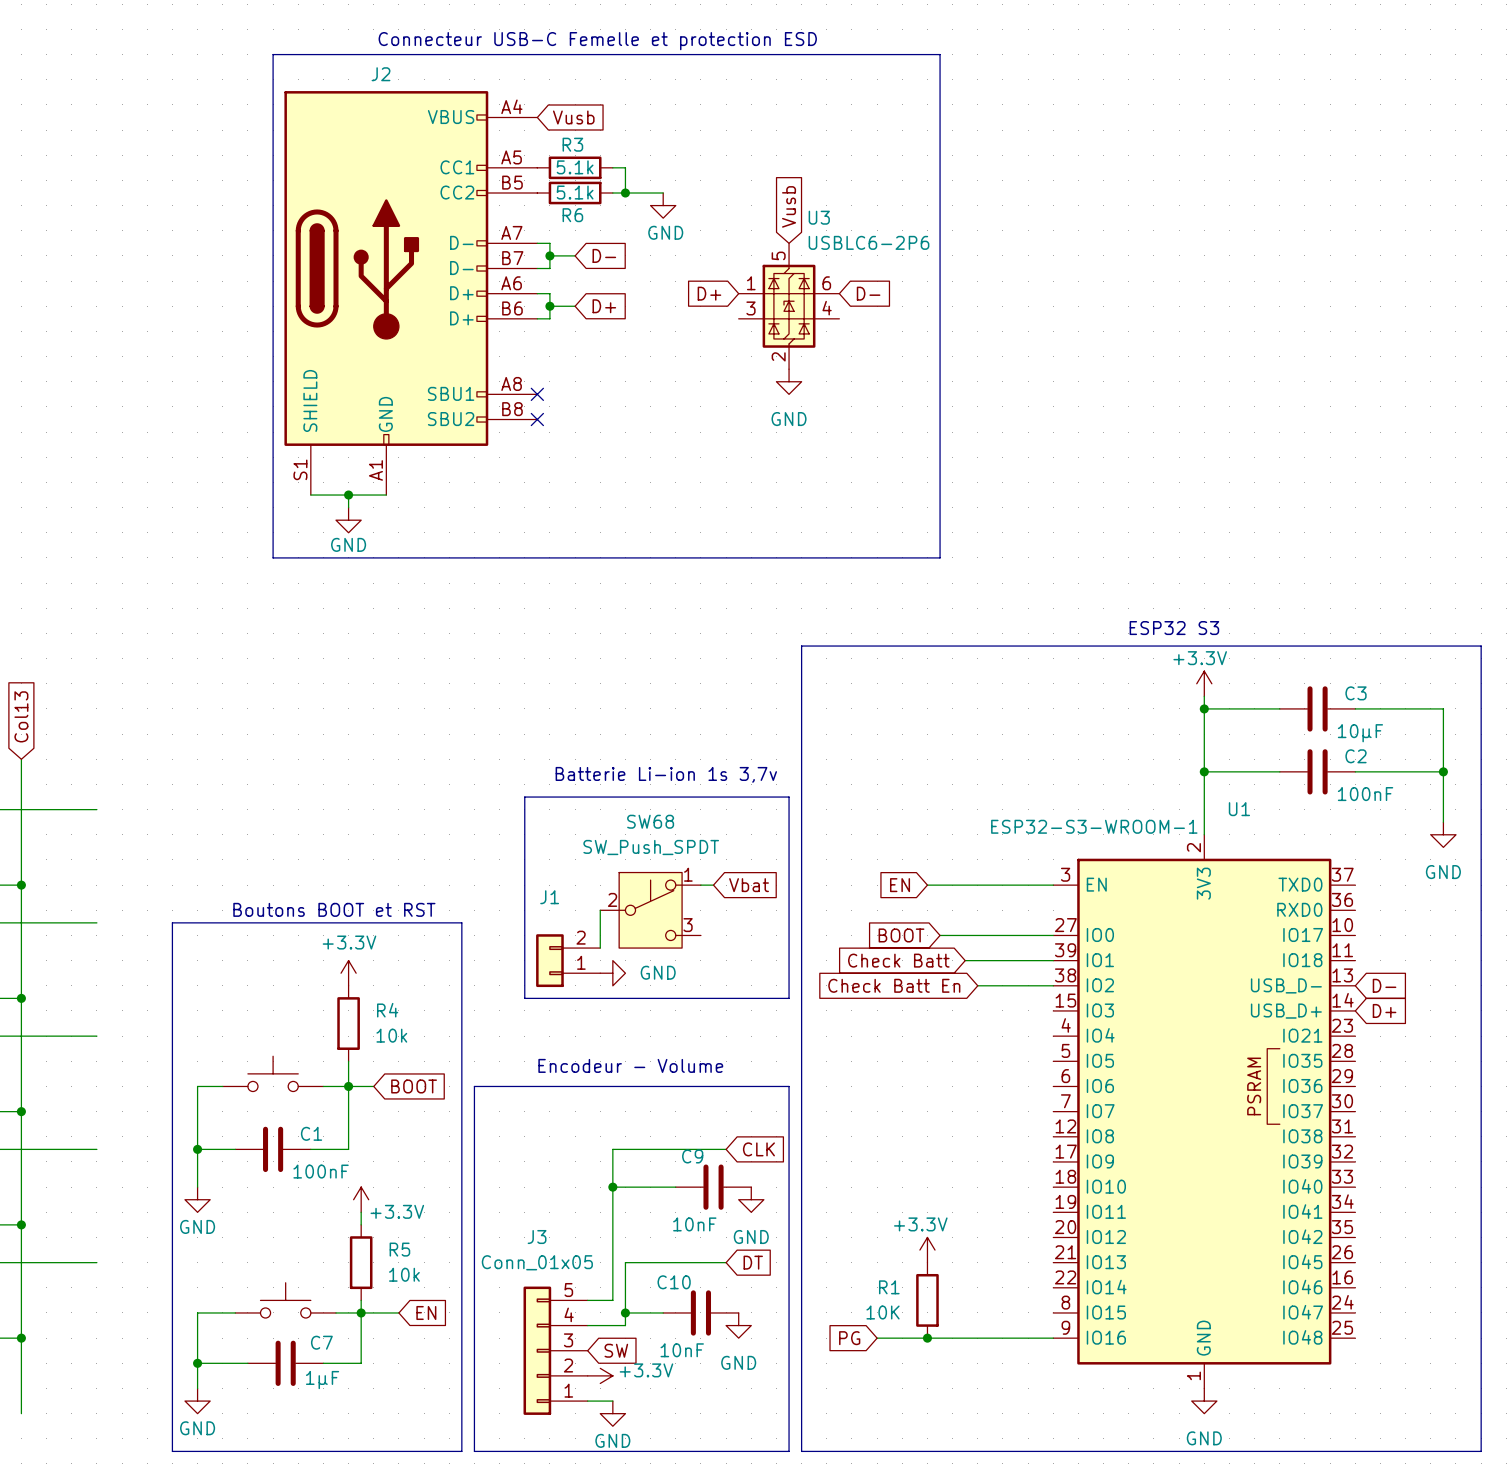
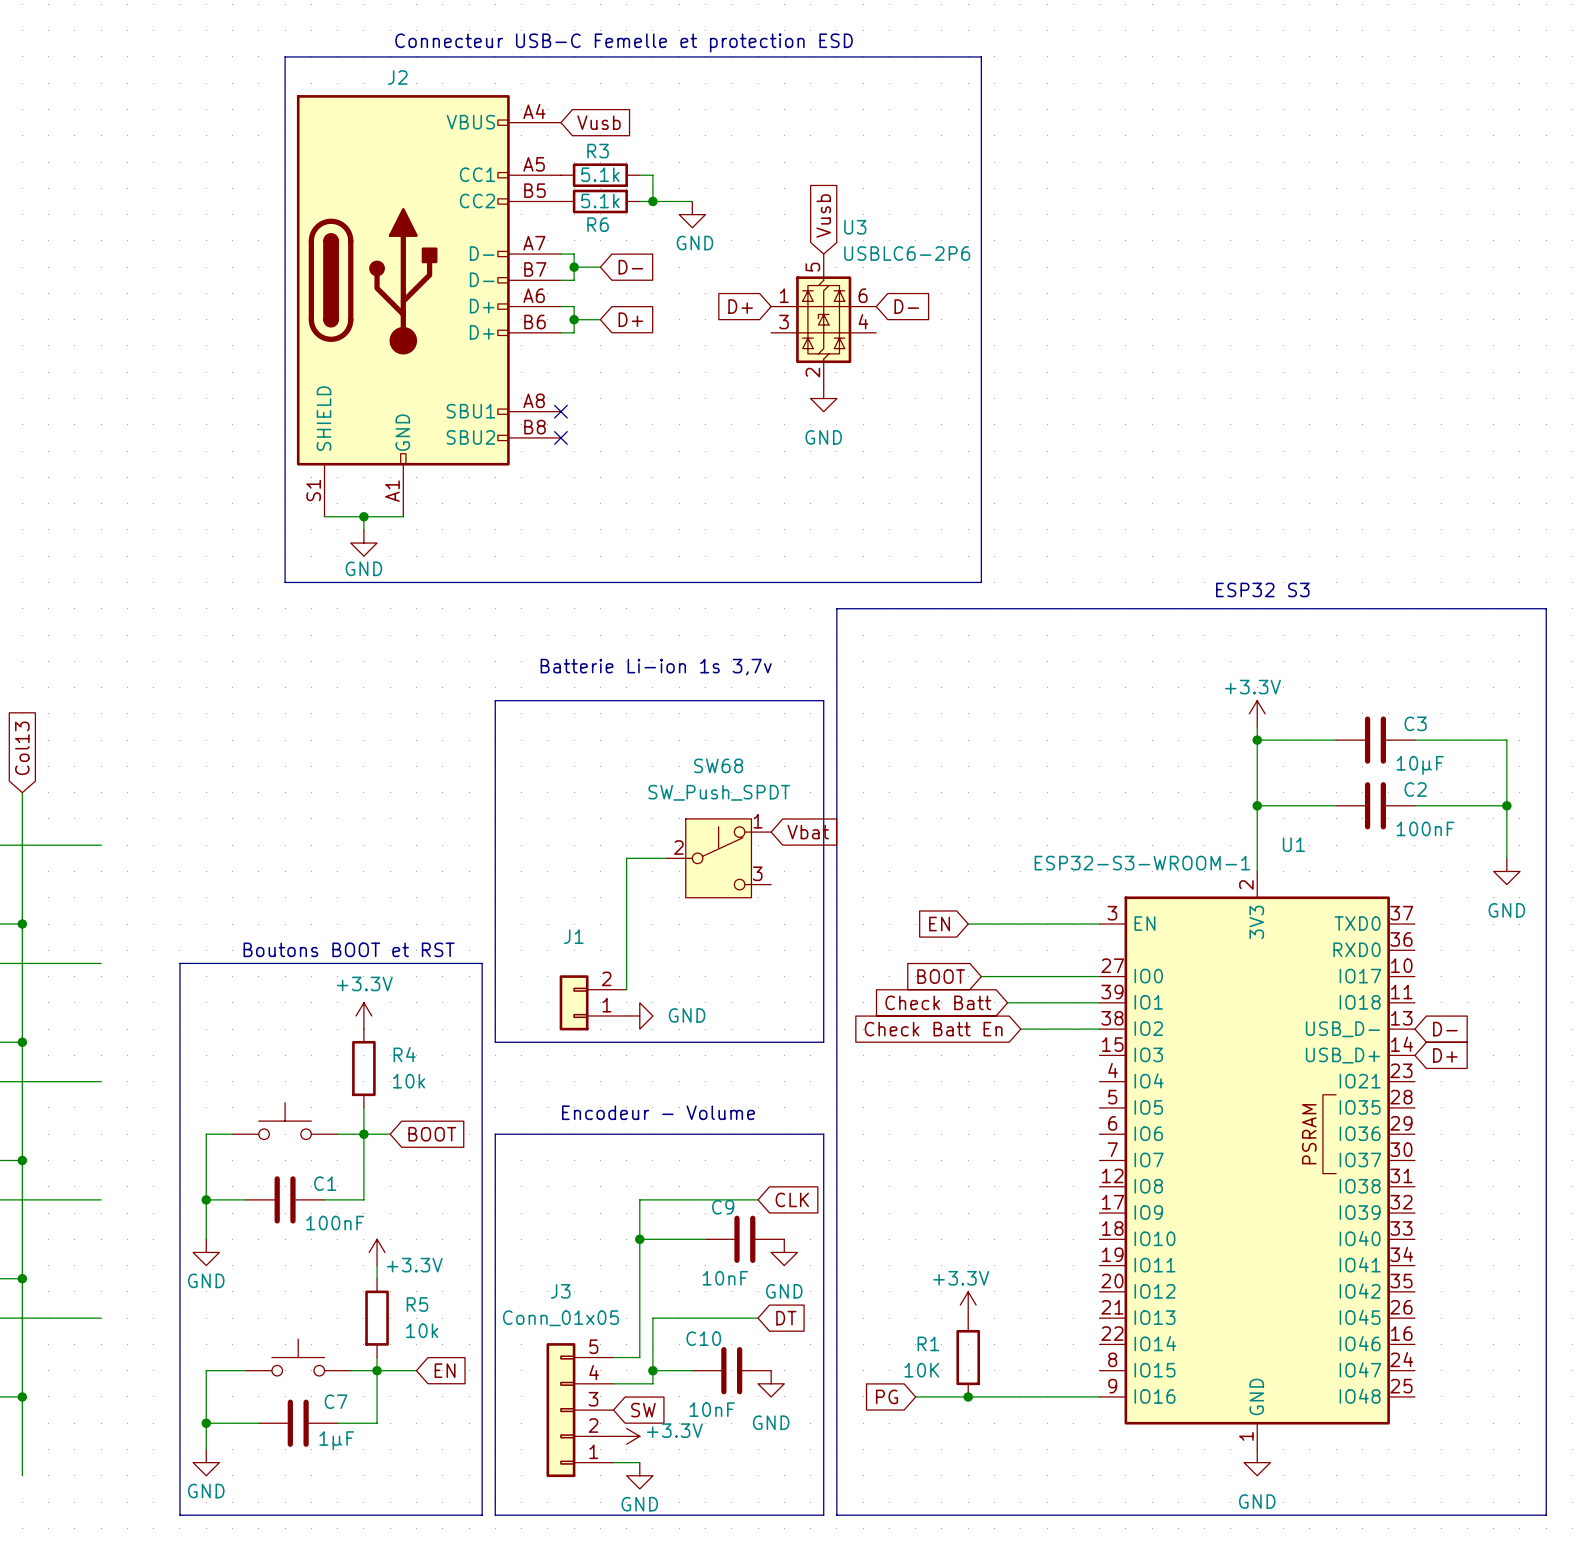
text position: ESP32 S3 (1174, 628) -> ESP32 S3 (1262, 589)
line: (801, 646) (1481, 646) -> (836, 674) (836, 608) (1546, 608) (1546, 674)
text position: Batterie Li-ion 1s 3,7v (666, 774) -> Batterie Li-ion 1s 3,7v (656, 667)
line: (789, 797) (524, 797) (524, 998) -> (823, 832) (823, 700) (495, 700) (495, 1042) (547, 1042)
wire: none -> (666, 858) (626, 858) (626, 950)
wire: (700, 885) (713, 885) -> none
global label position: Vbat (749, 885) -> Vbat (808, 832)
SW68 position: (650, 910) -> (718, 858)

